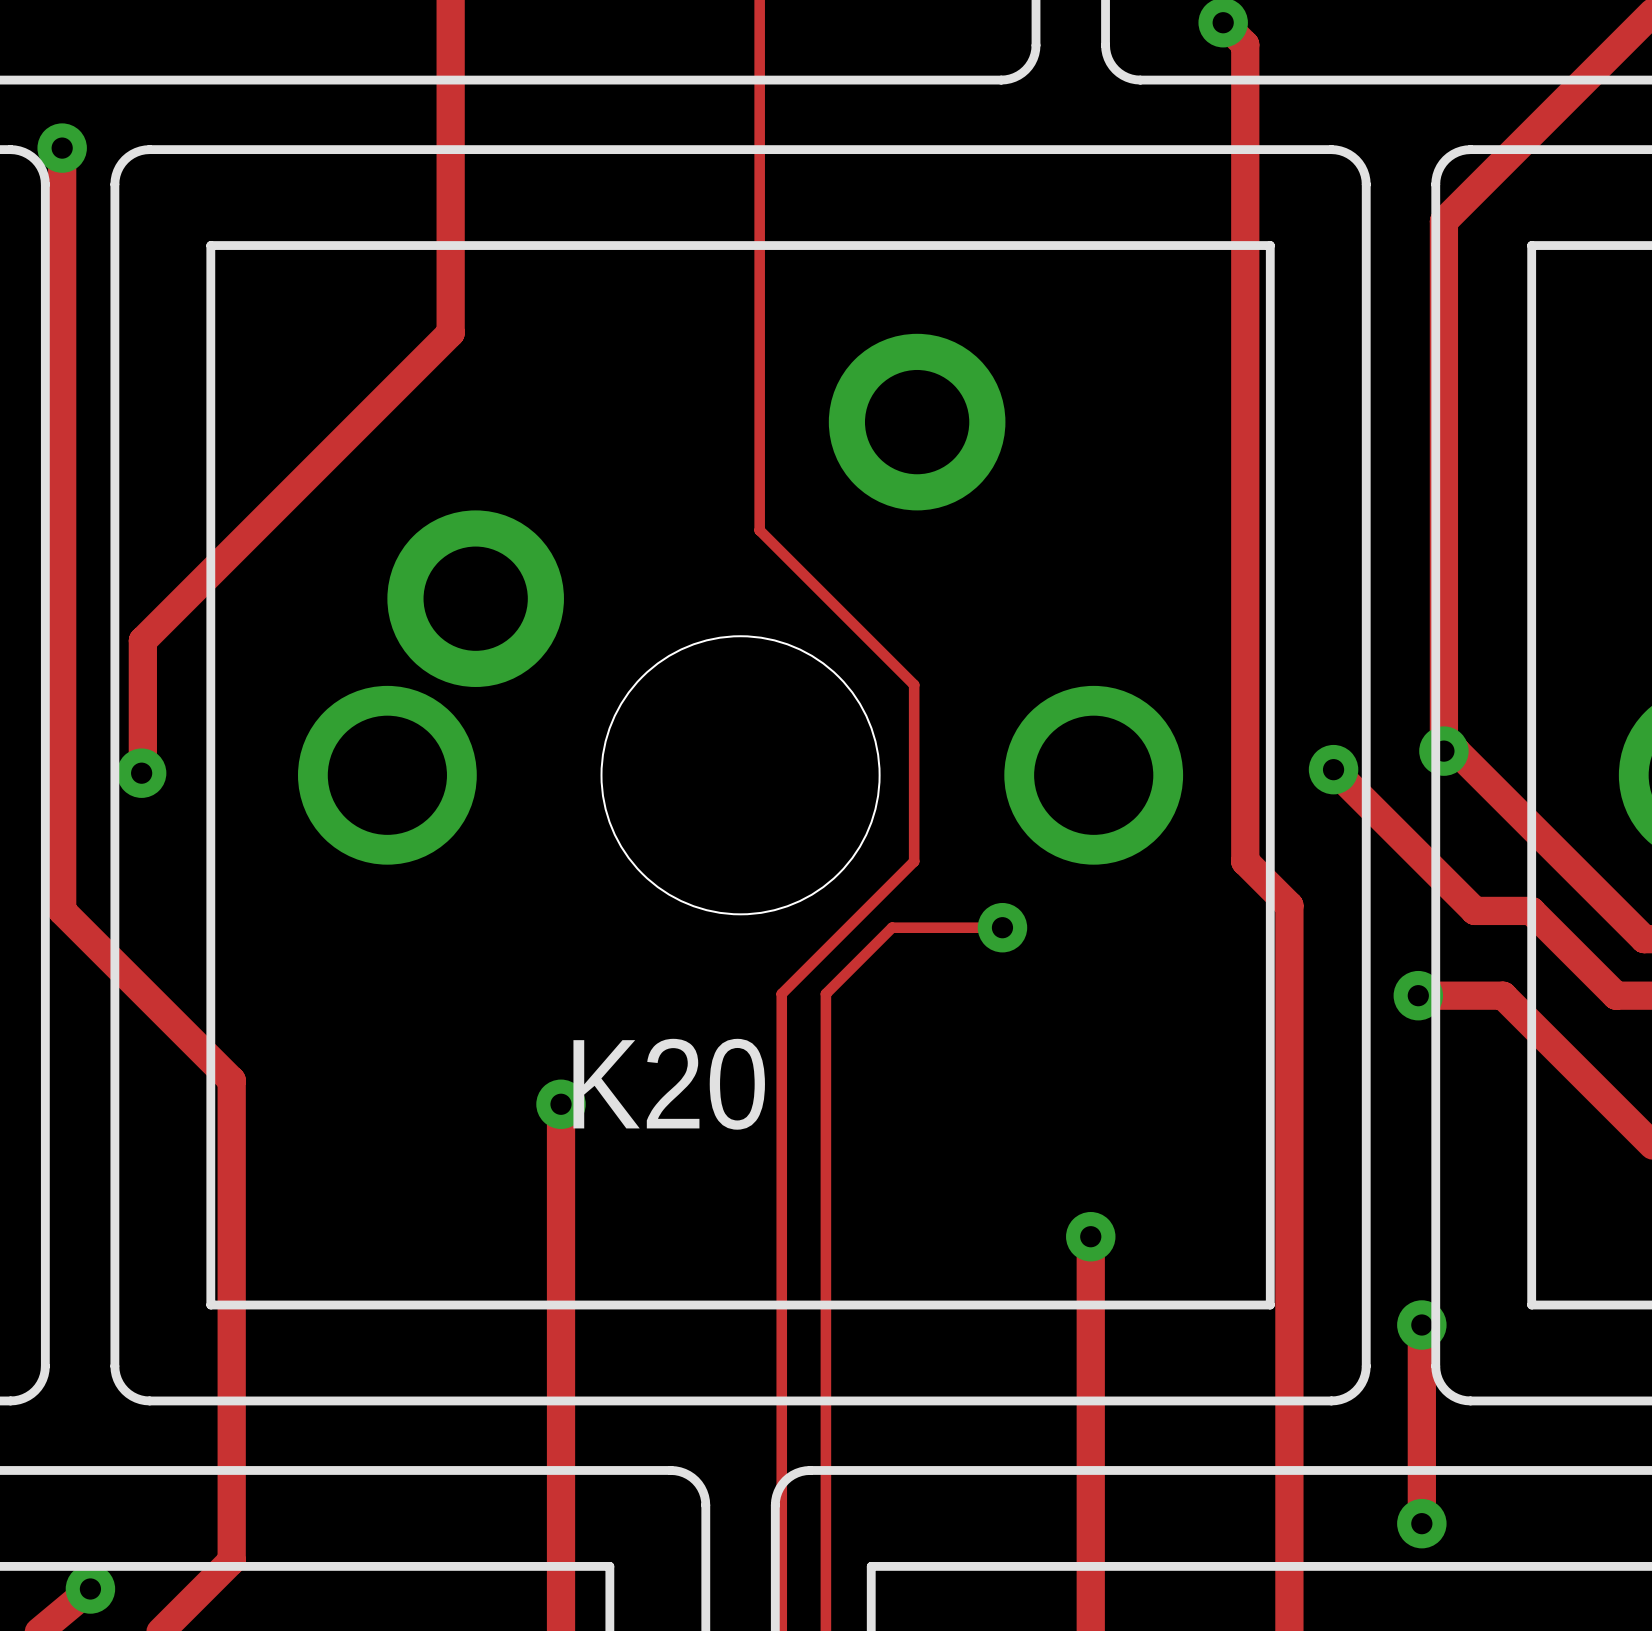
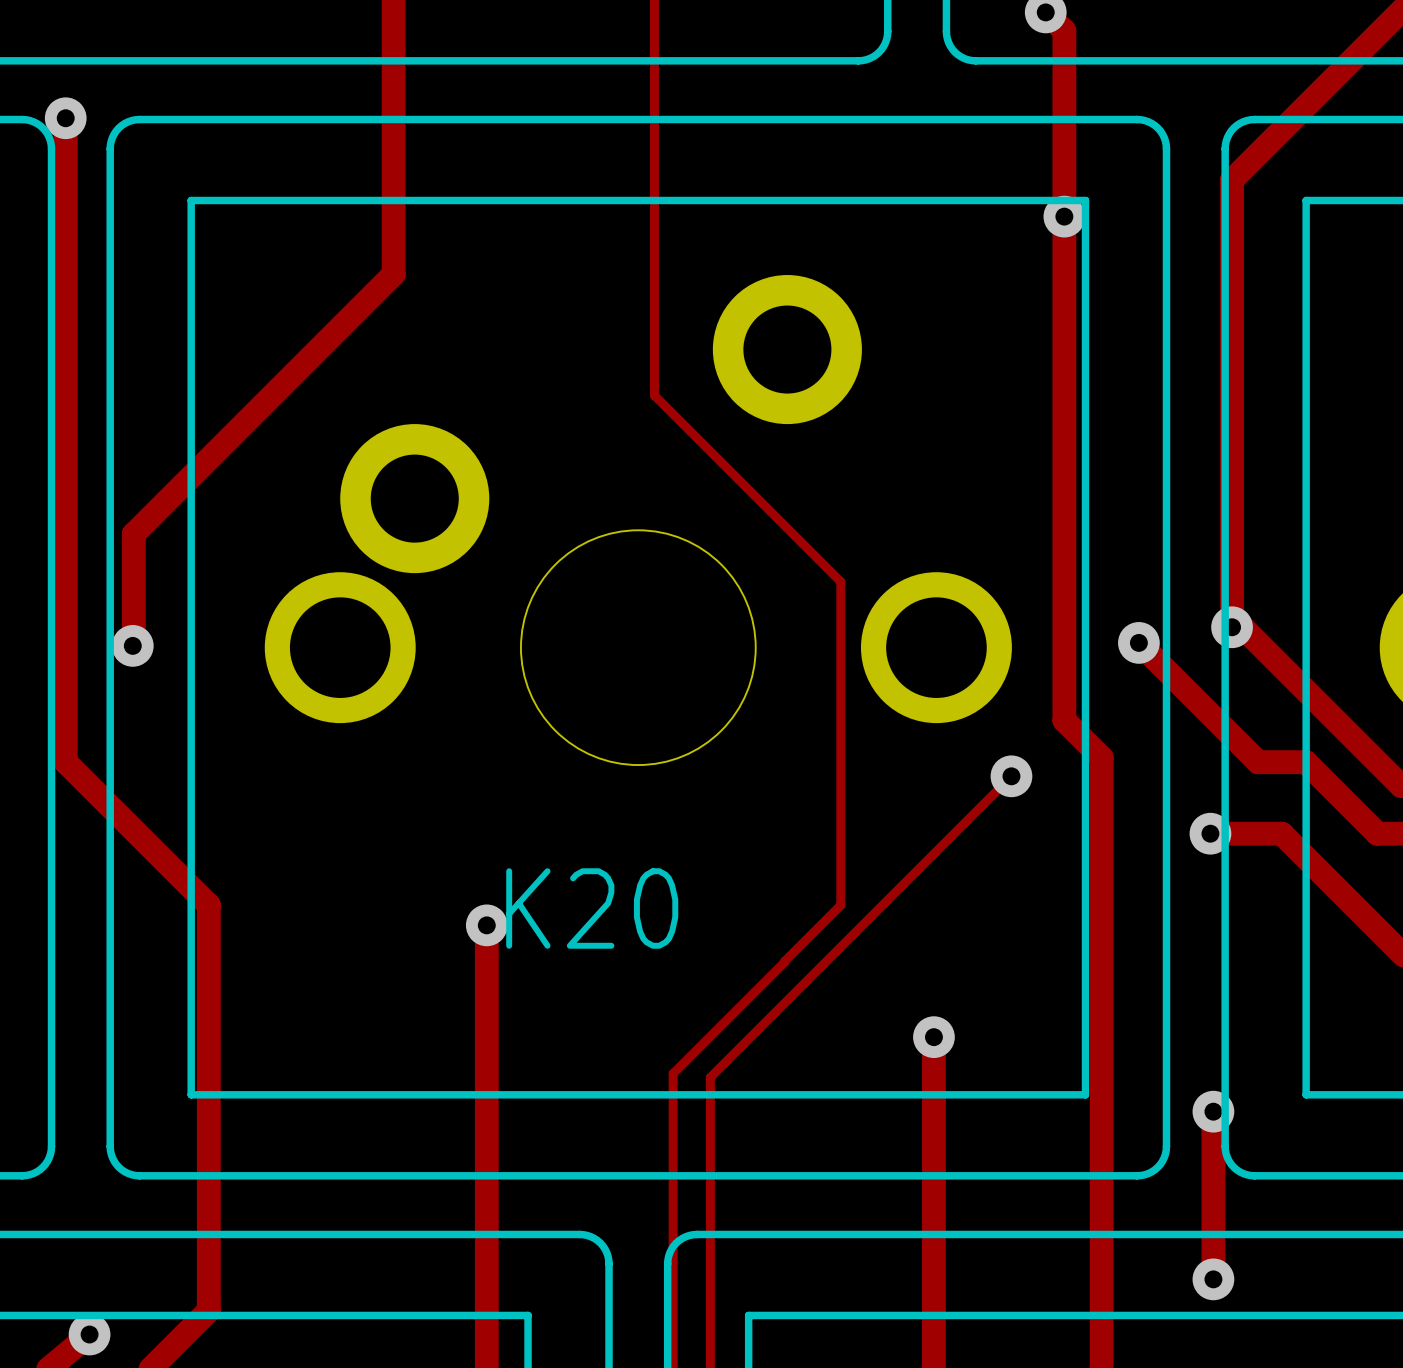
via: none -> (1064, 216)
track: (759, 476) (759, 530) (914, 684) (914, 861) (781, 993) (781, 1279) -> (654, 395) (840, 581) (840, 905) (784, 961)
track: (1002, 927) (892, 927) (825, 993) (825, 1284) -> (1011, 776) (710, 1077)
via position: (1002, 927) -> (1011, 776)
track: none -> (784, 961) (673, 1073)

